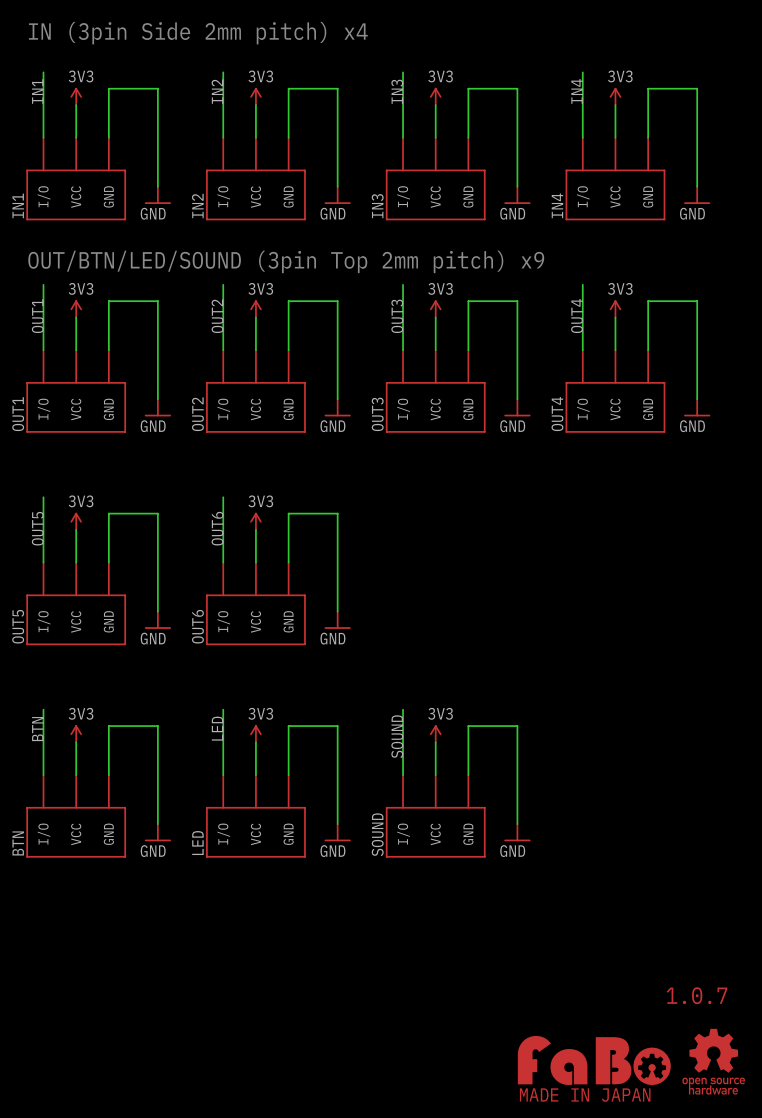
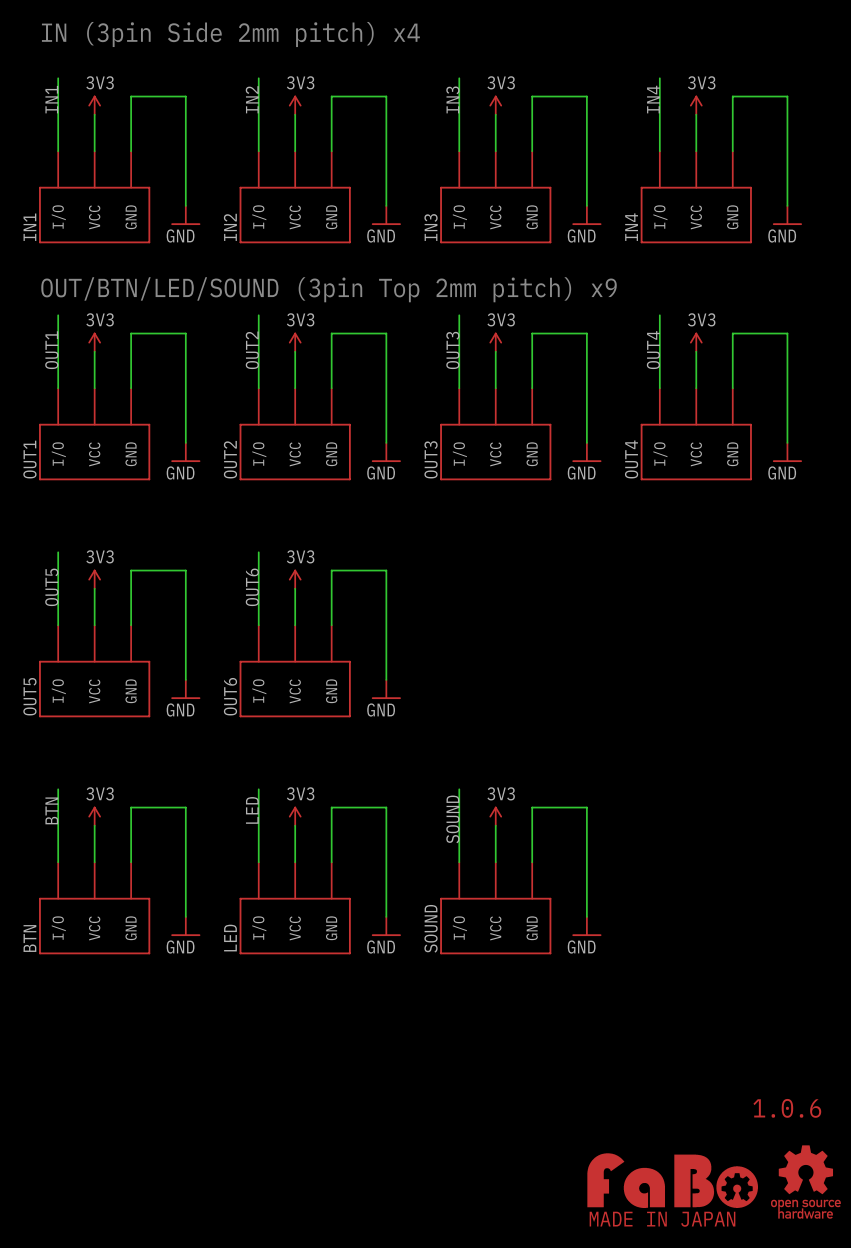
text: 1.0.7 (697, 995) -> 1.0.6 (787, 1108)

